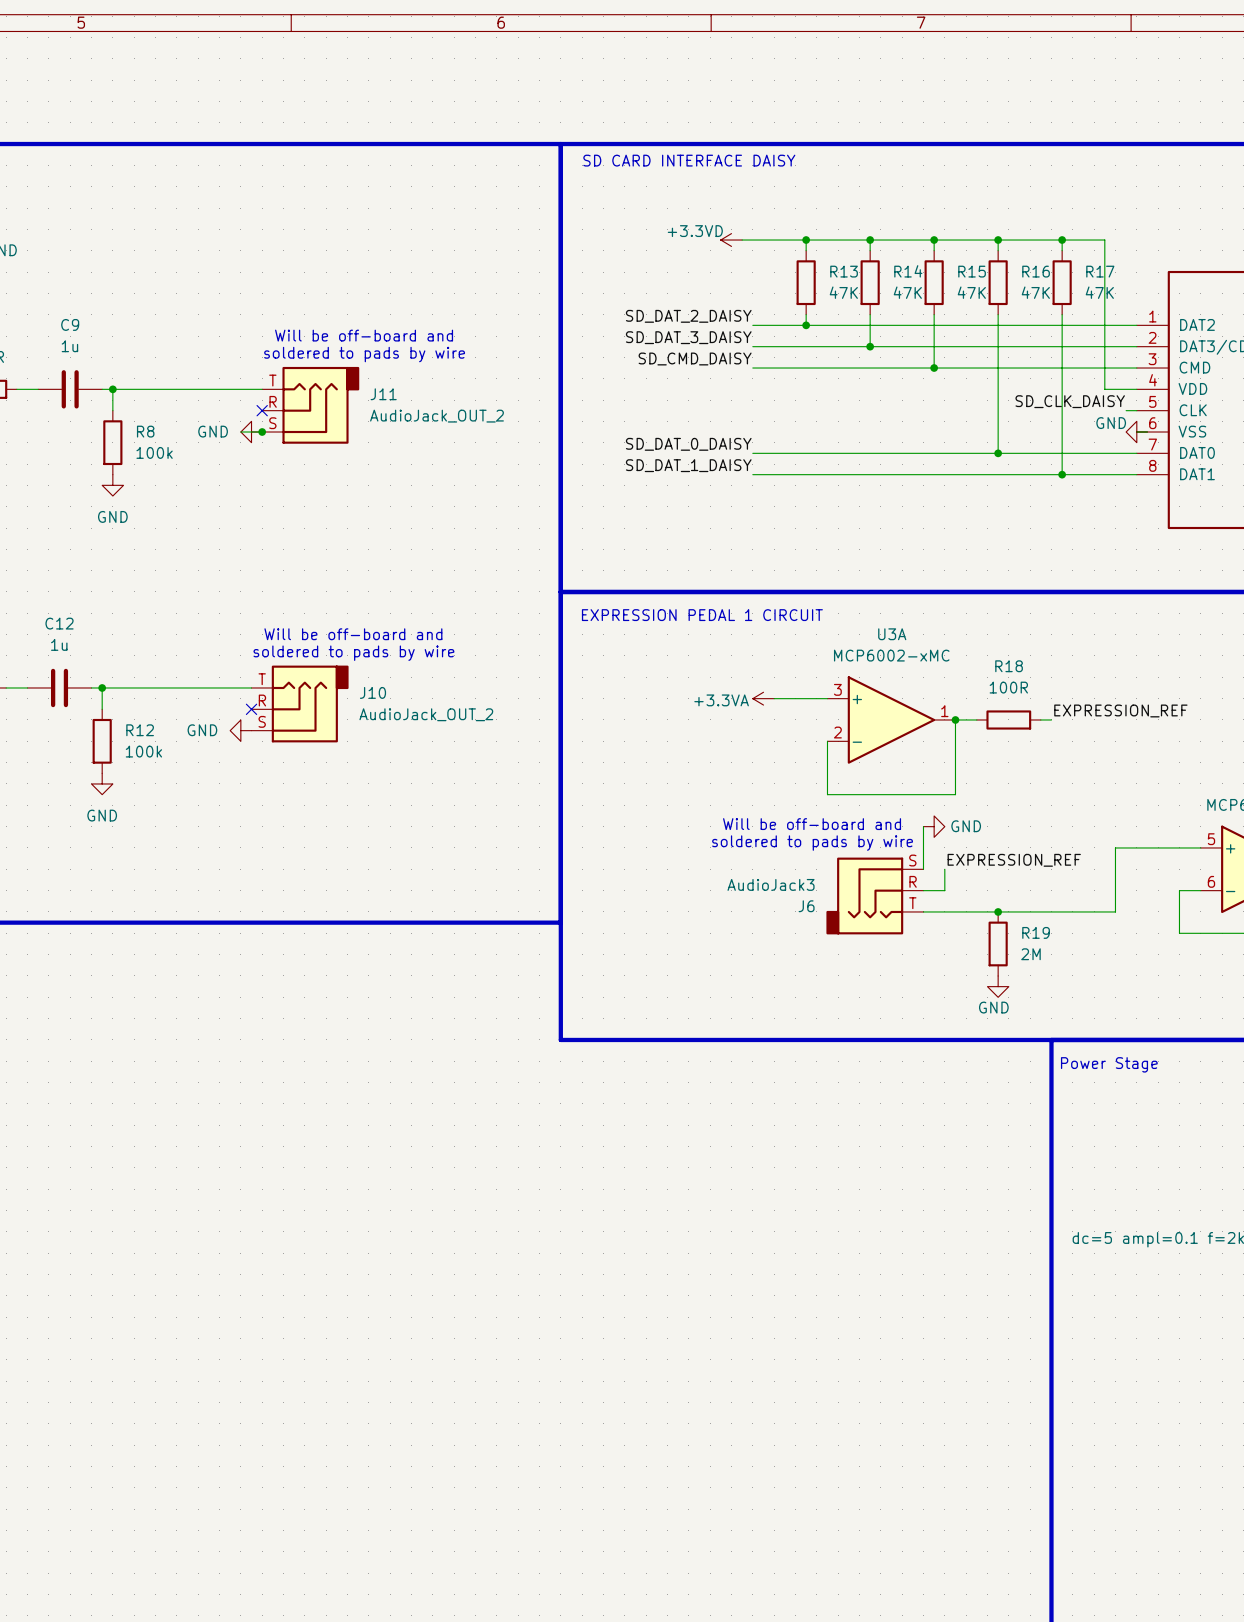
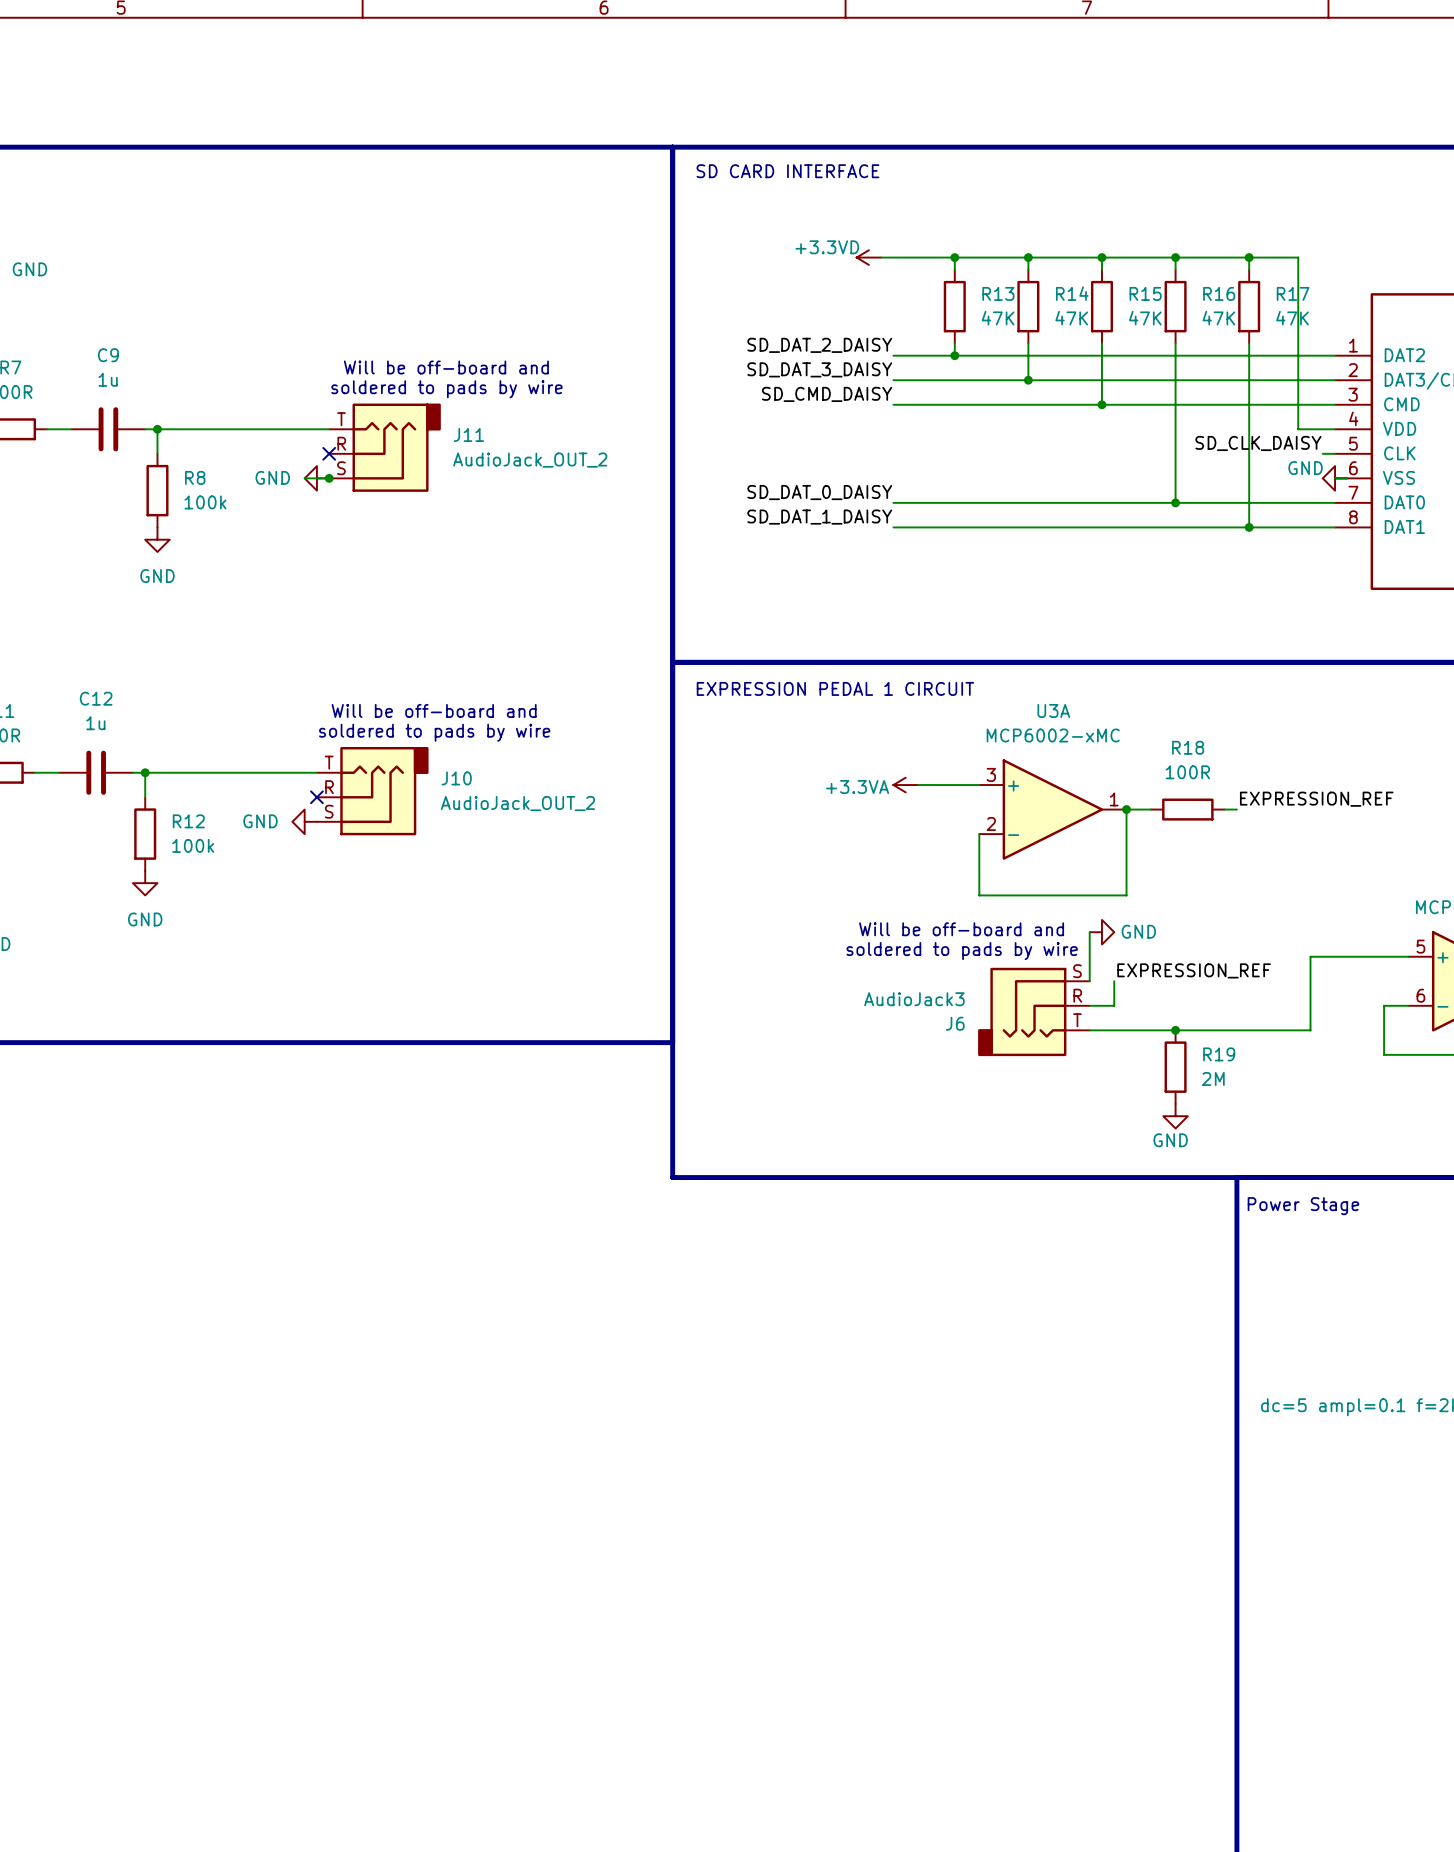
text: SD CARD INTERFACE DAISY (689, 160) -> SD CARD INTERFACE (787, 171)

